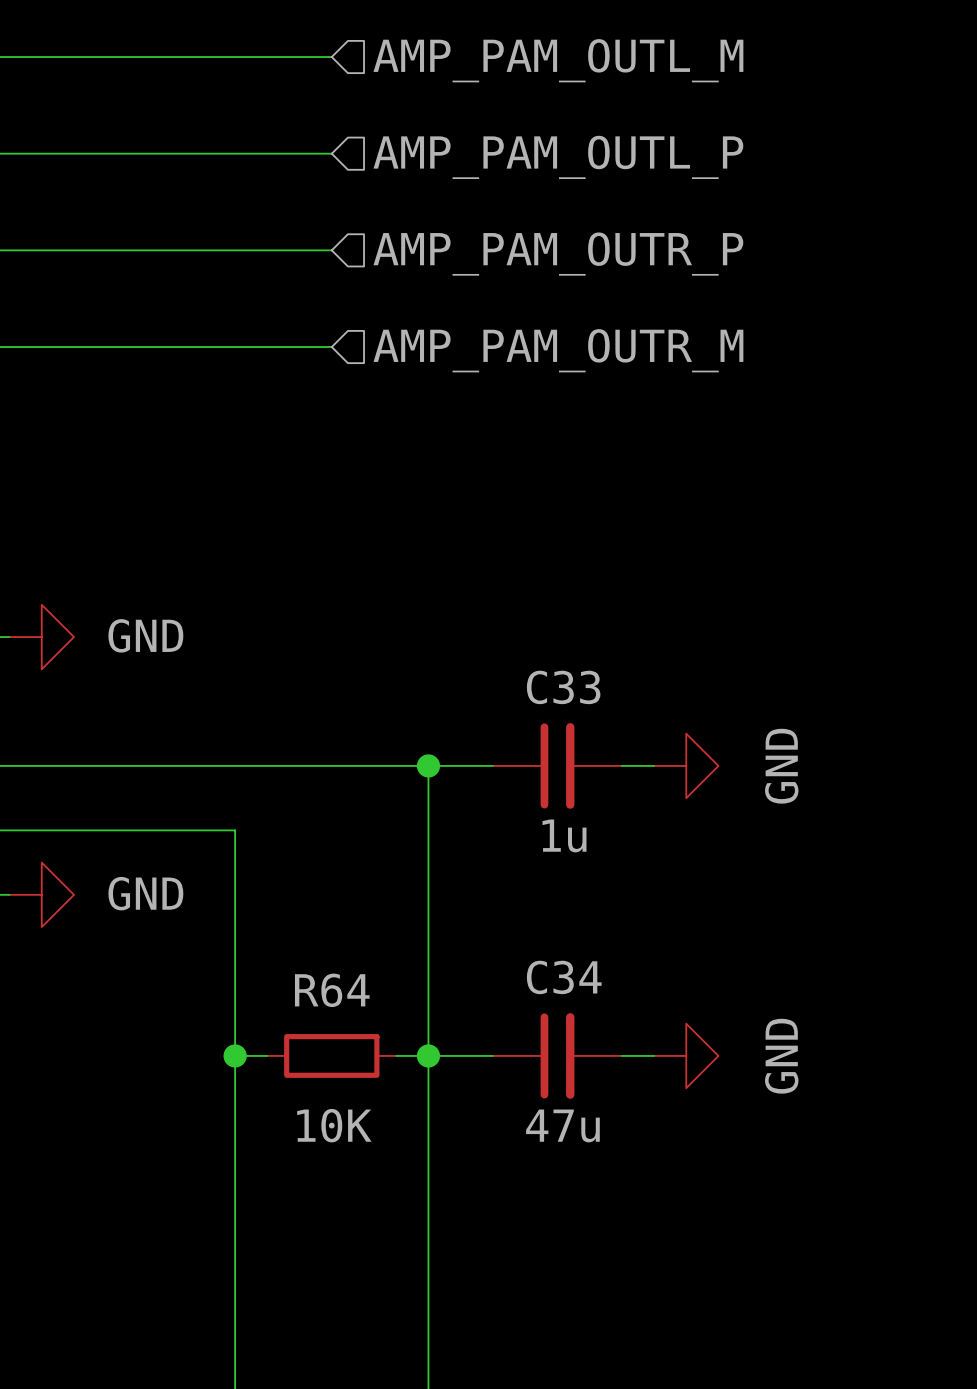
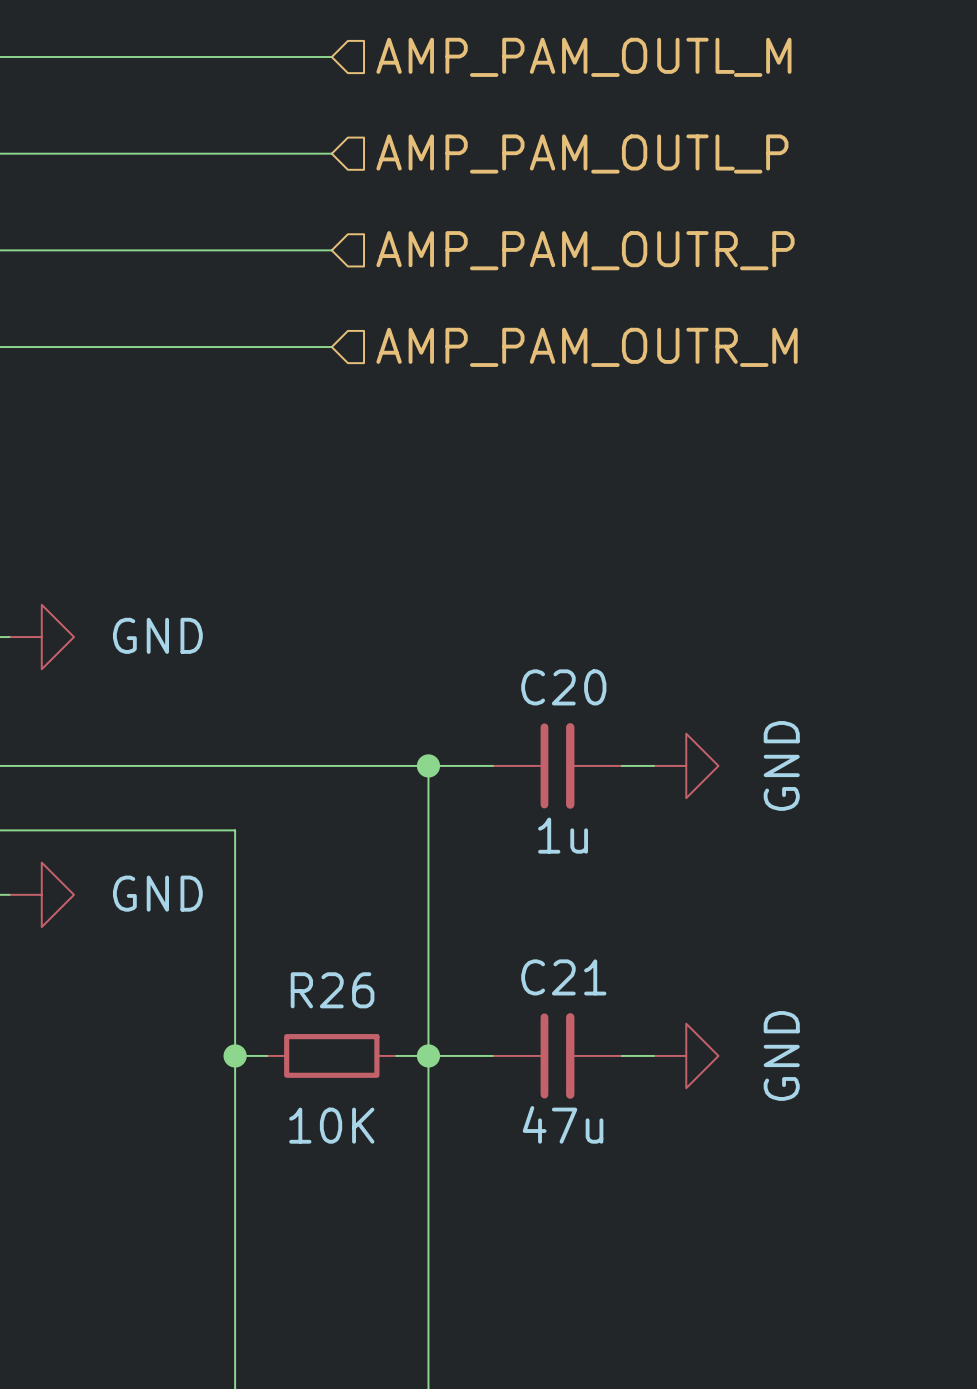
C33 name: C33 (563, 687) -> C20 (563, 687)
C34 name: C34 (564, 977) -> C21 (563, 977)
R64 name: R64 (332, 990) -> R26 (332, 990)

